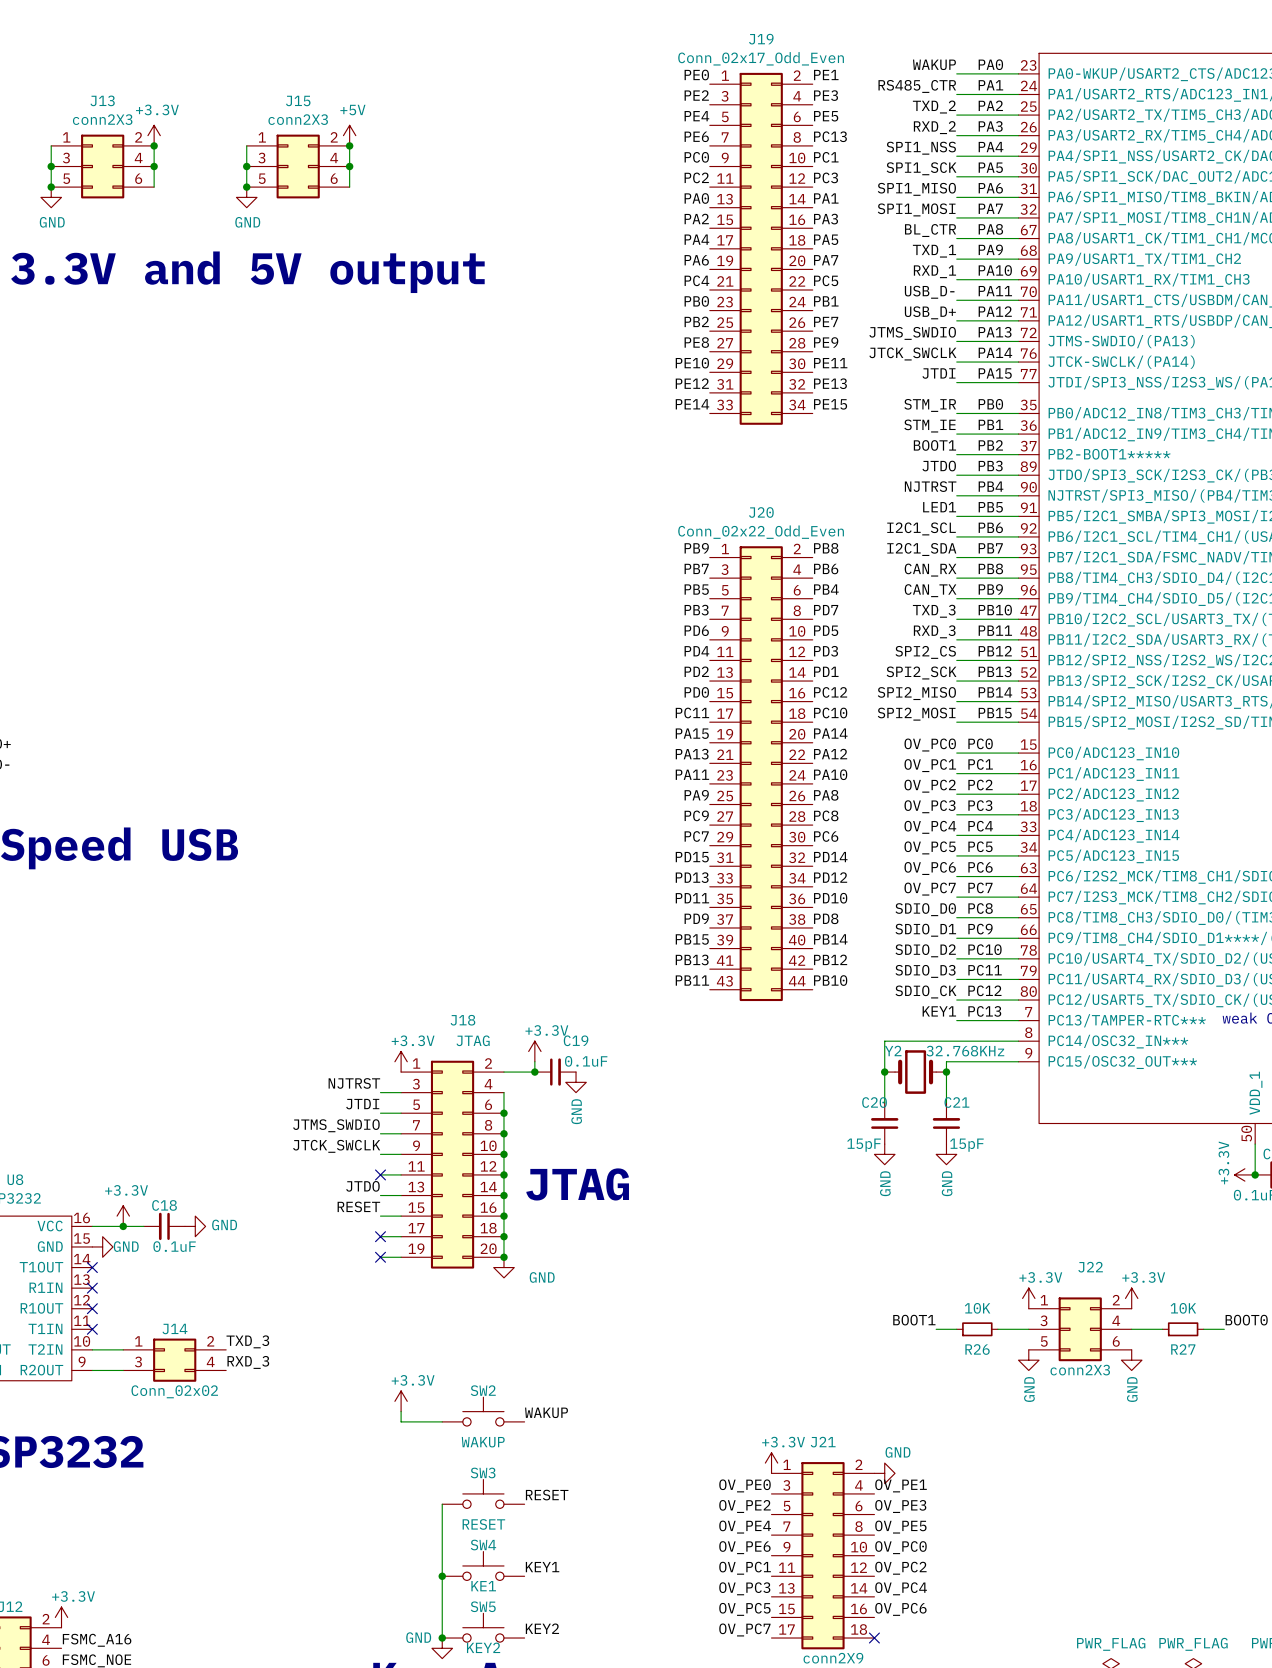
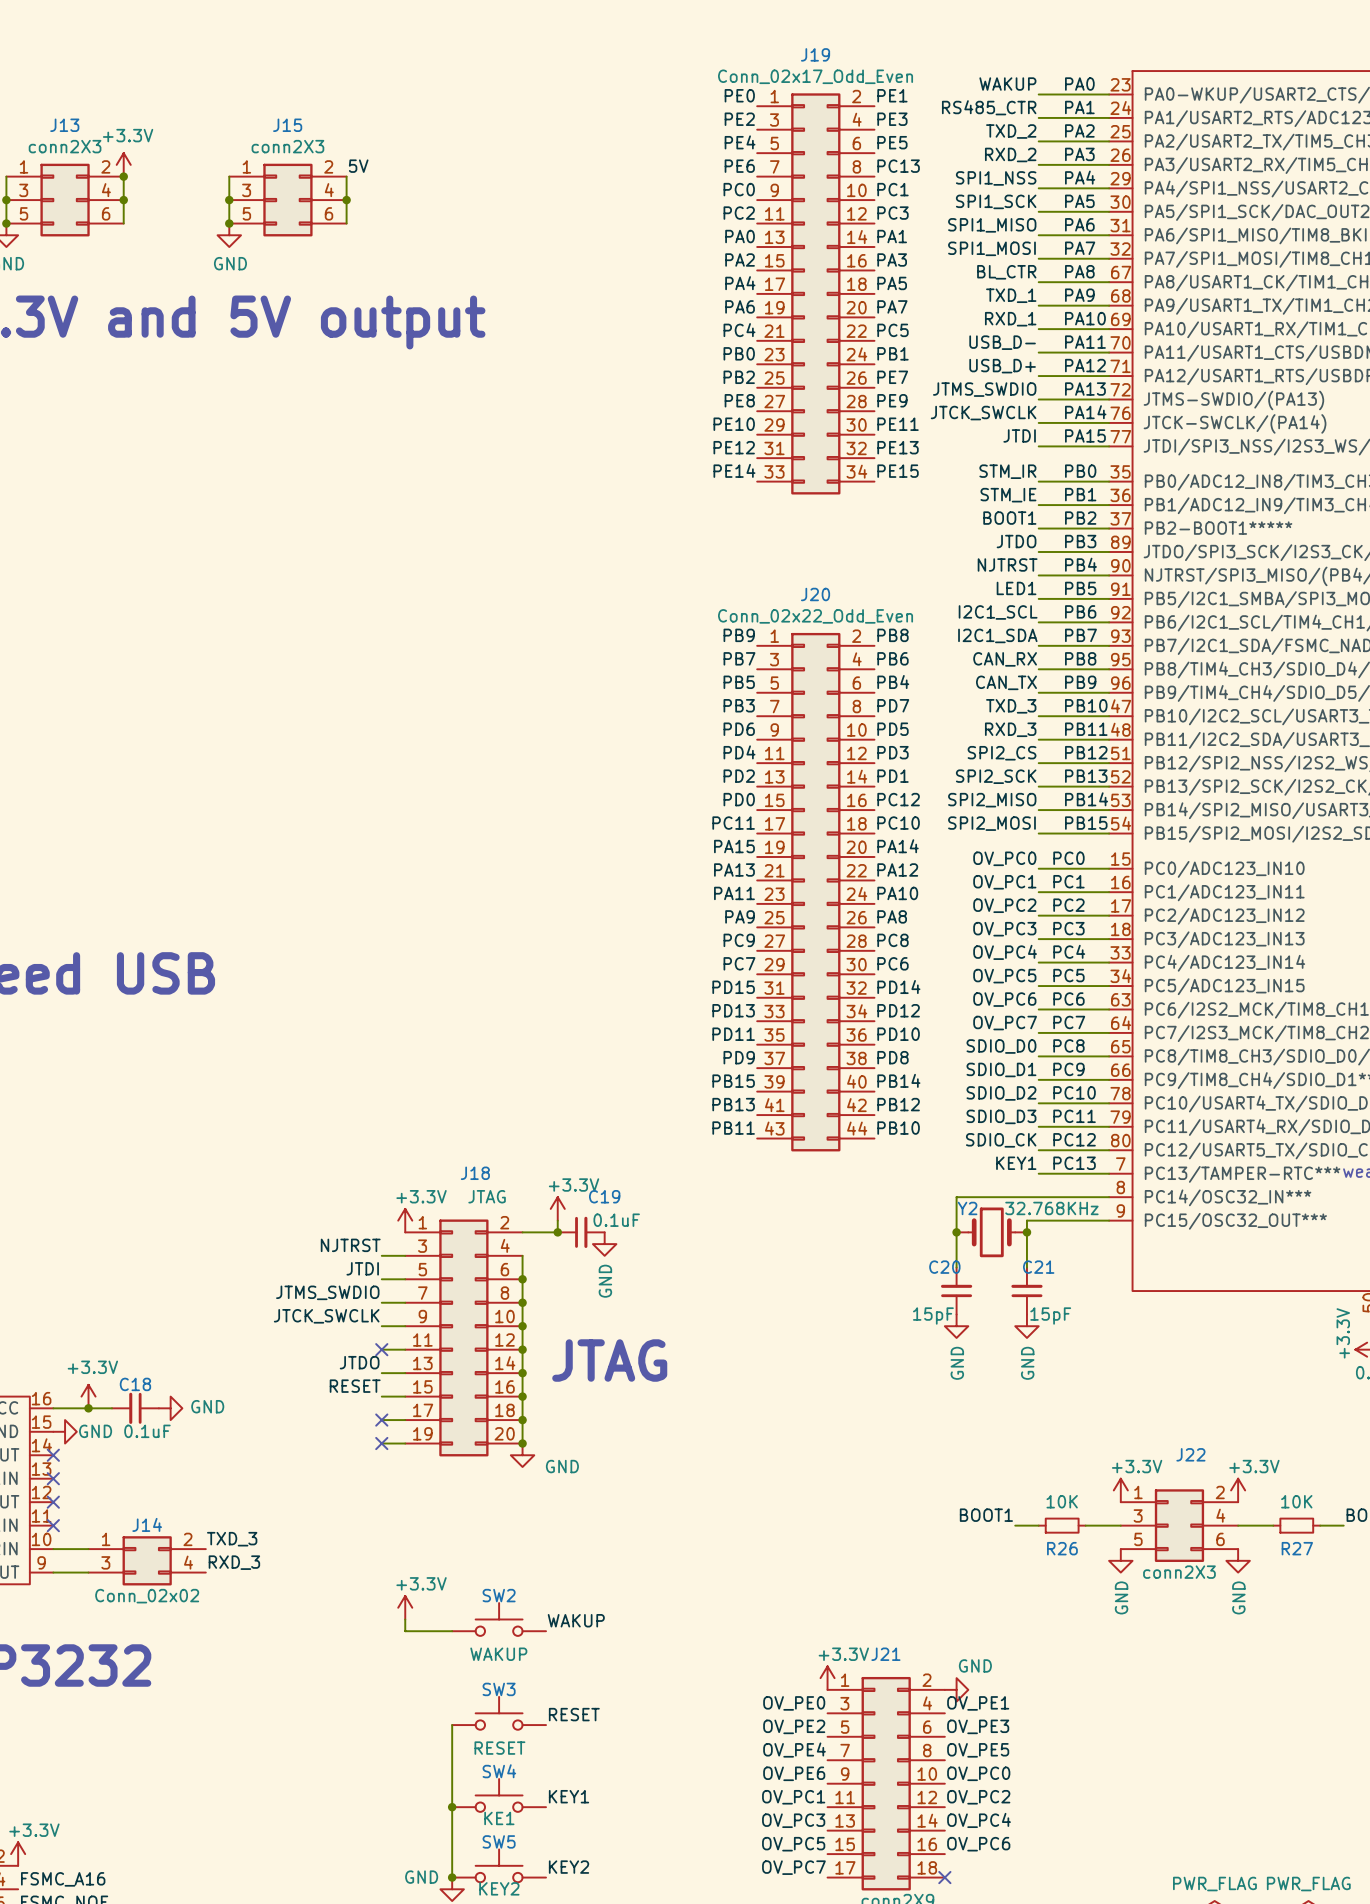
power symbol: +5V (349, 135) -> none
label: none -> 5V (358, 166)
junction: (349, 145) -> none

